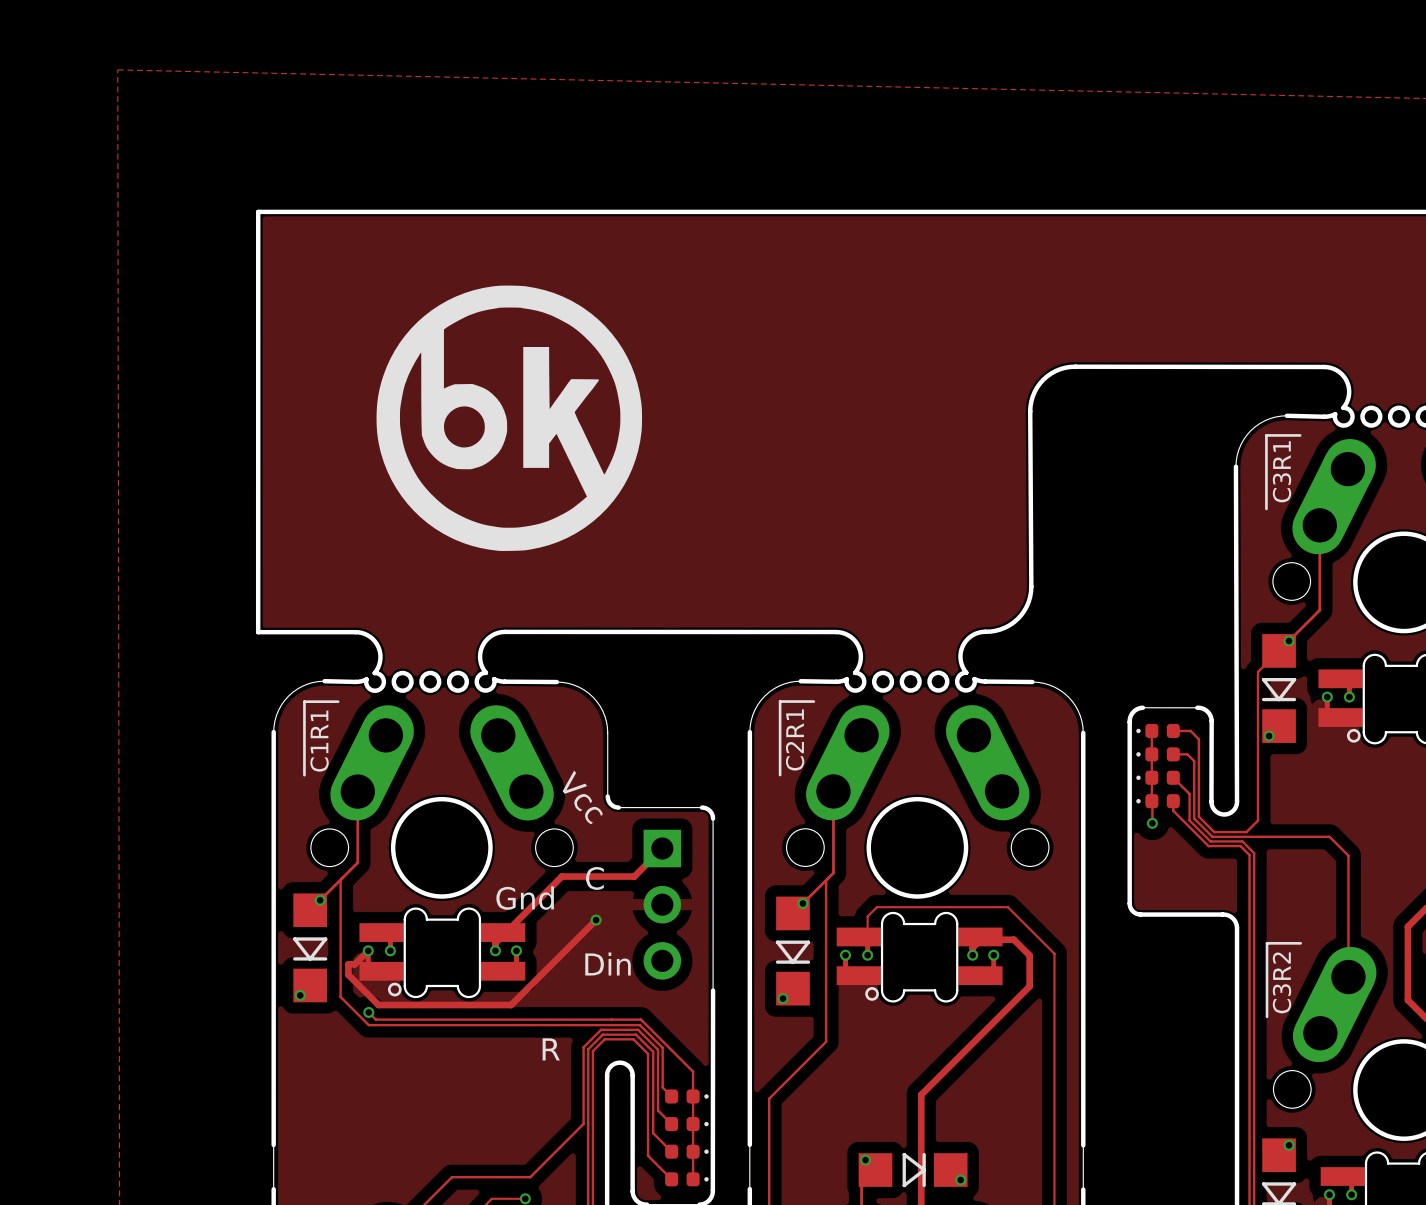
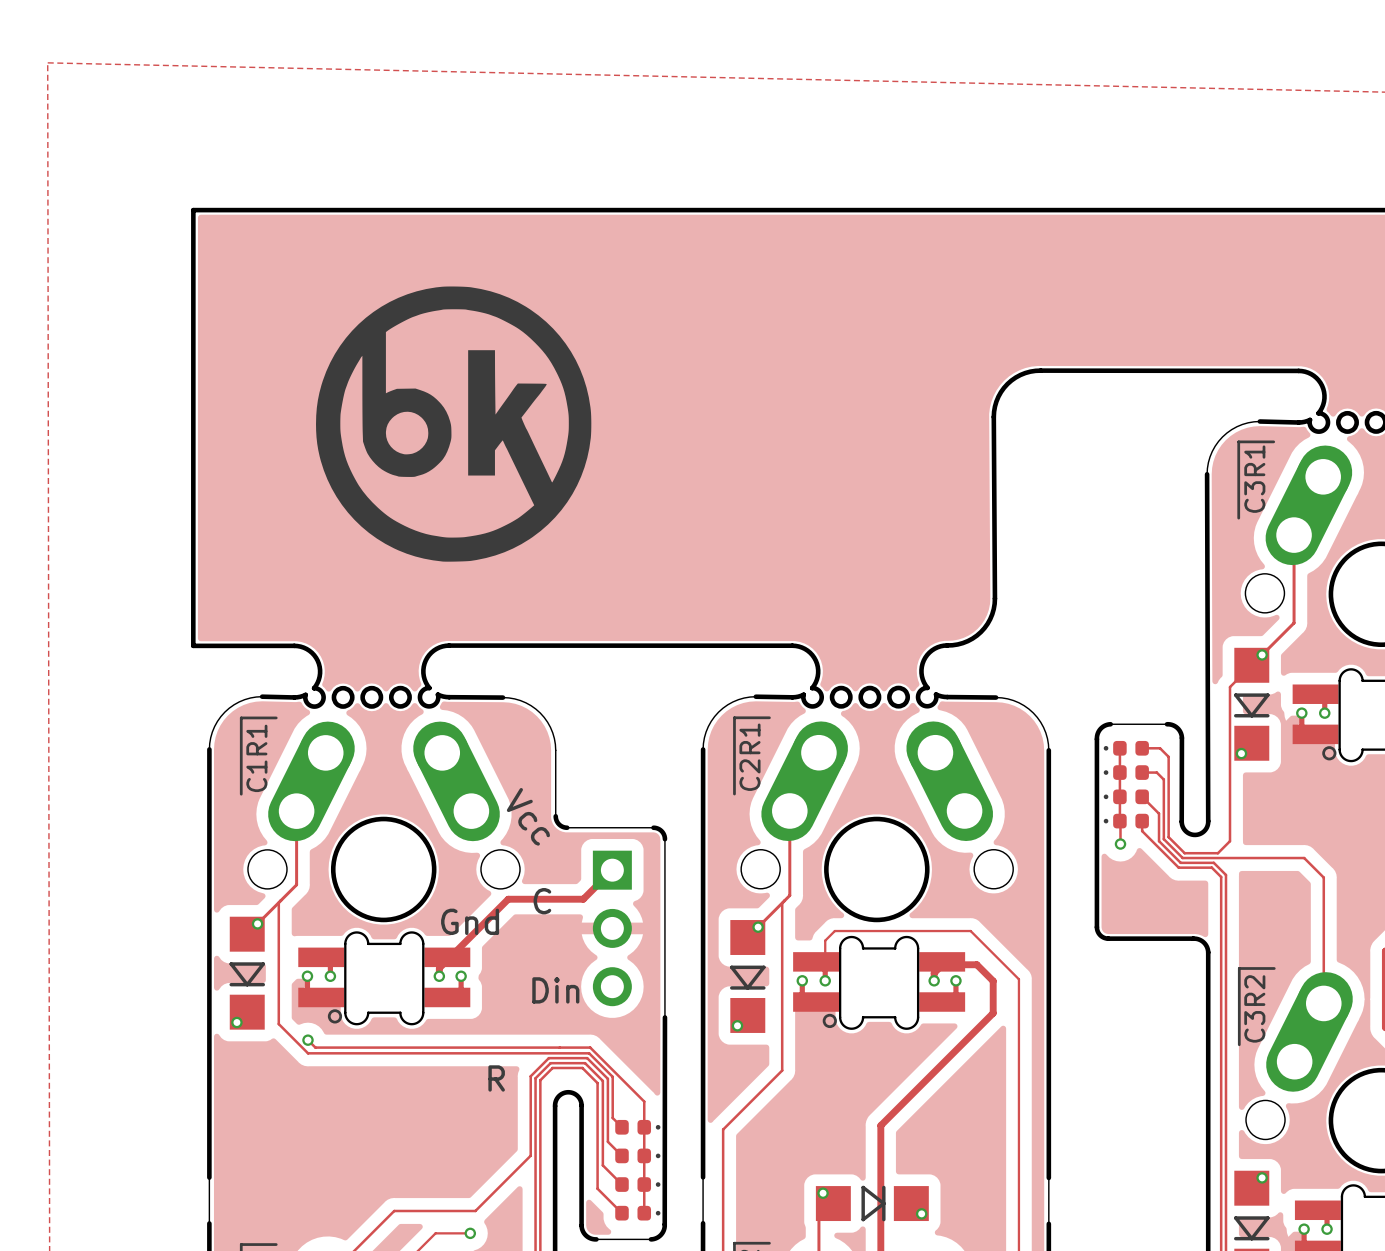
track: (596, 920) (511, 1005) (378, 1005) (348, 974) (348, 964) (354, 964) (368, 950) -> none
via: (596, 920) -> none

